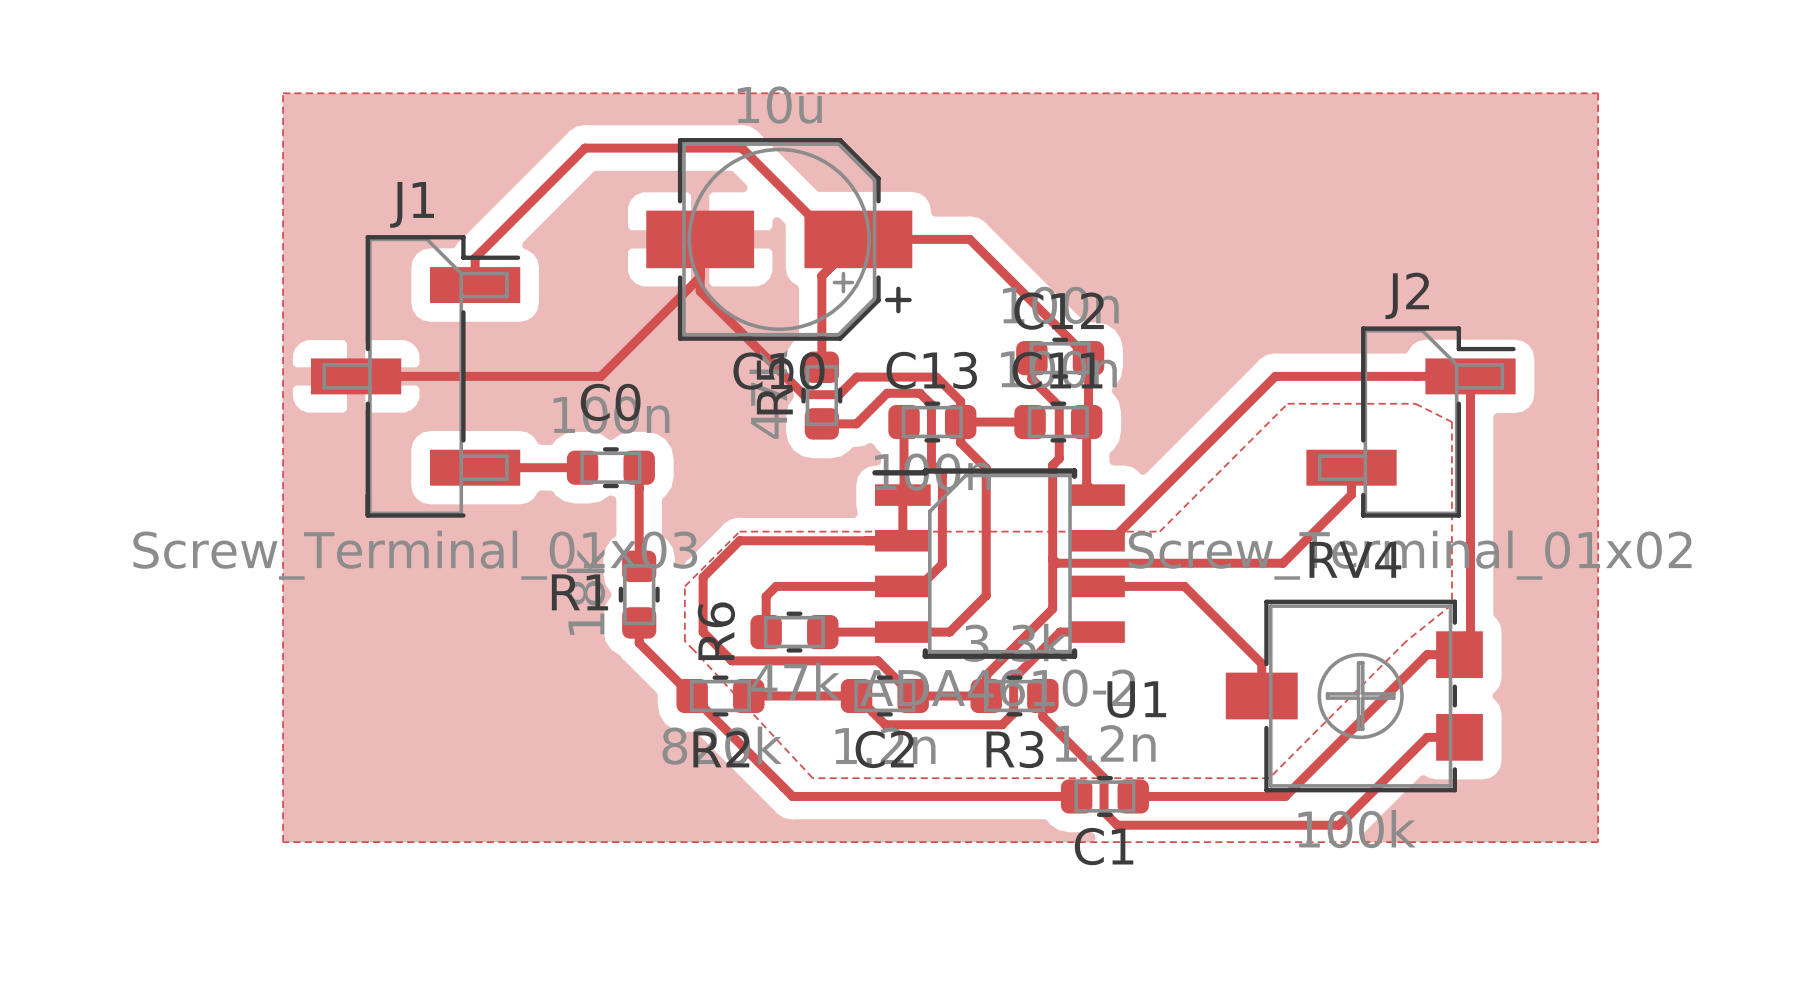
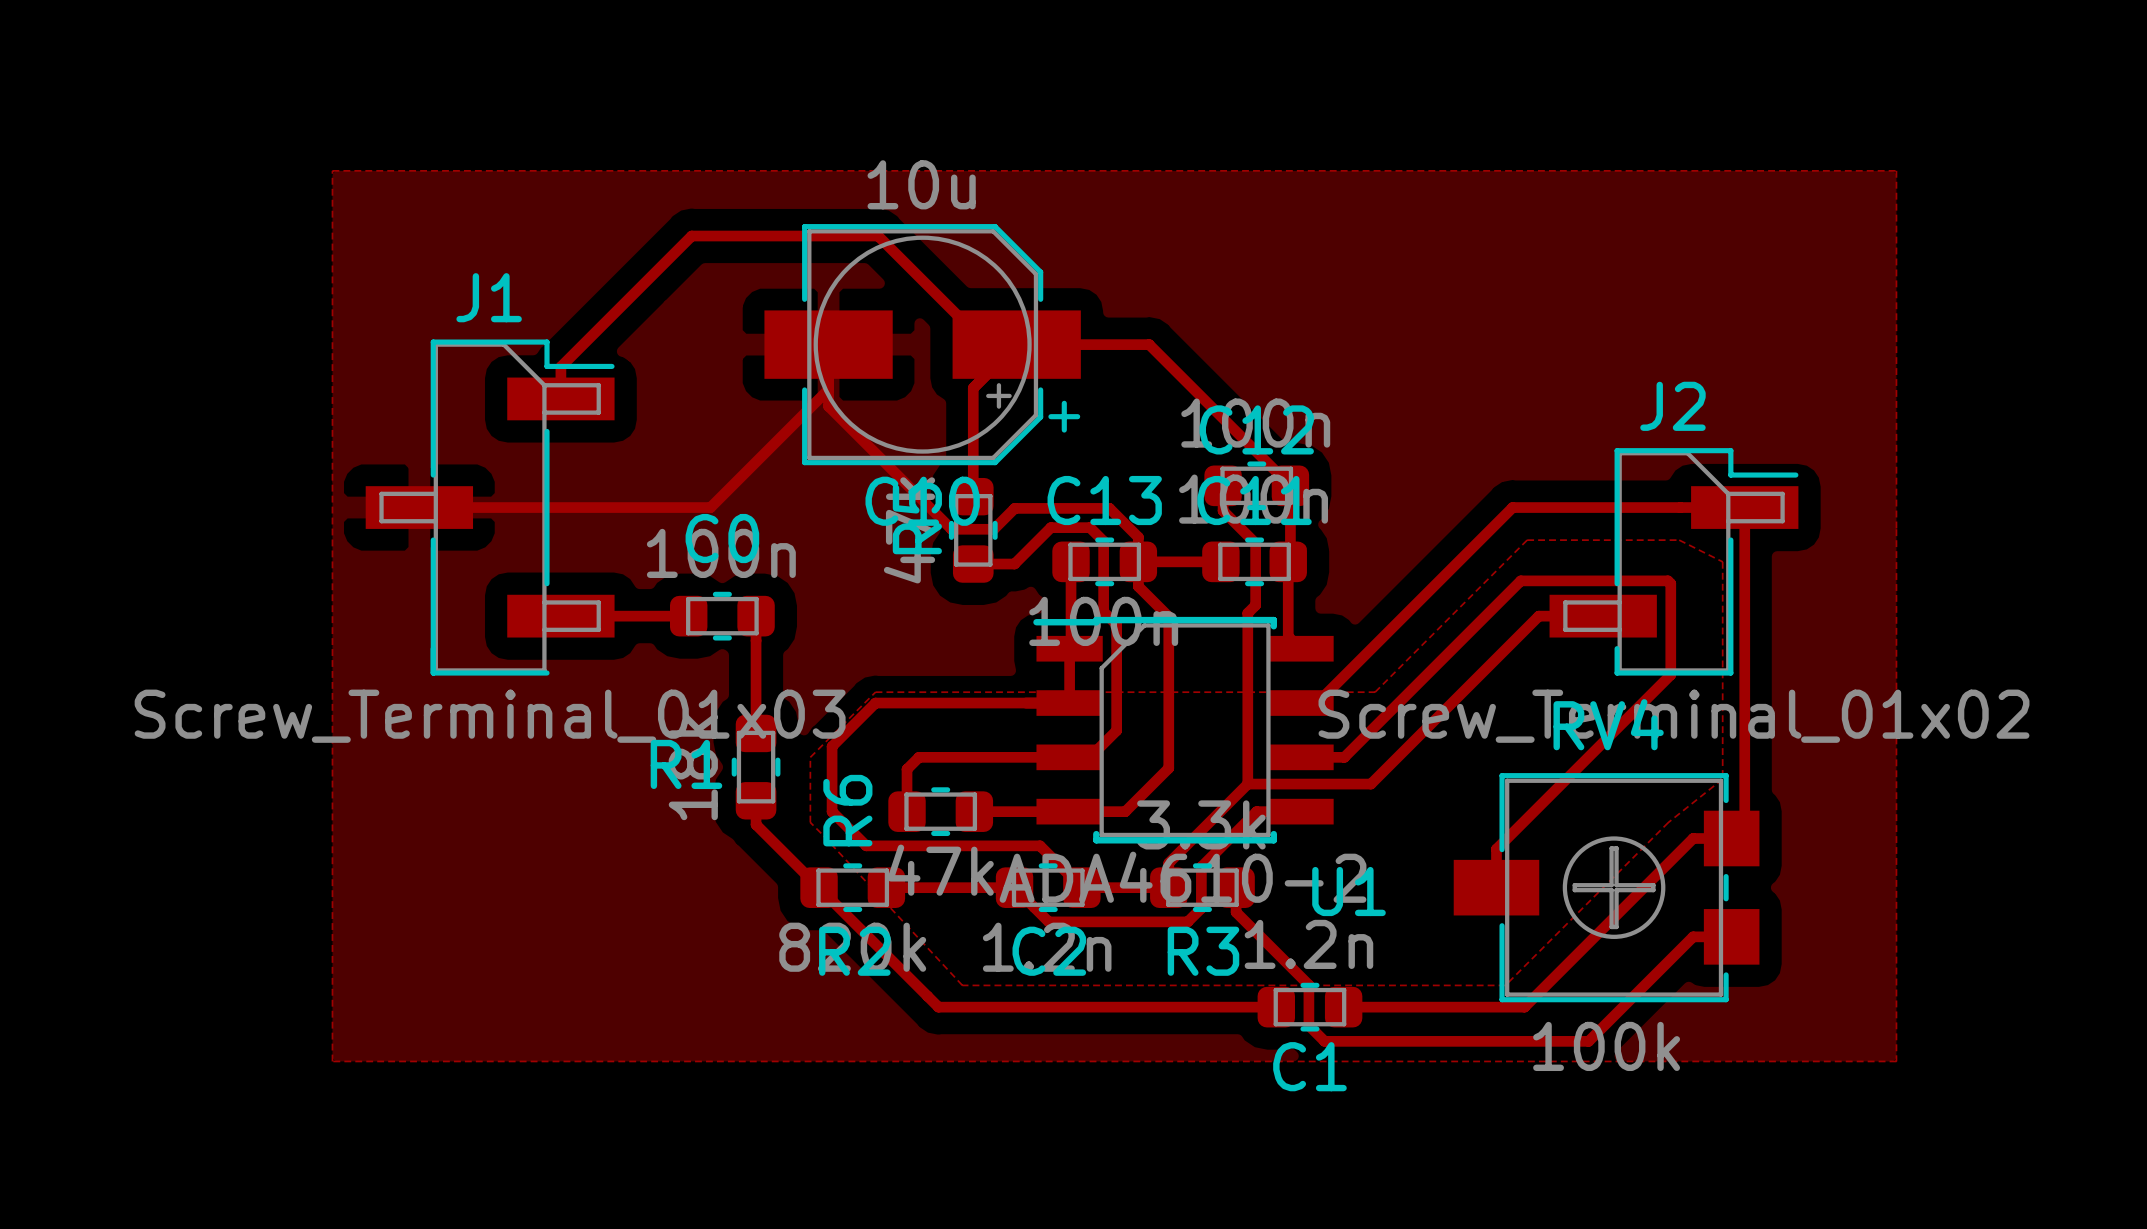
track: none -> (1570, 616) (1538, 616) (1370, 784) (1247, 784)
track: (1351, 467) (1351, 494) (1282, 563) (1056, 563) (1052, 559) -> none
track: (1133, 586) (1184, 586) (1261, 663) -> (1344, 757) (1520, 580) (1667, 580) (1670, 583) (1670, 674) (1496, 849)

